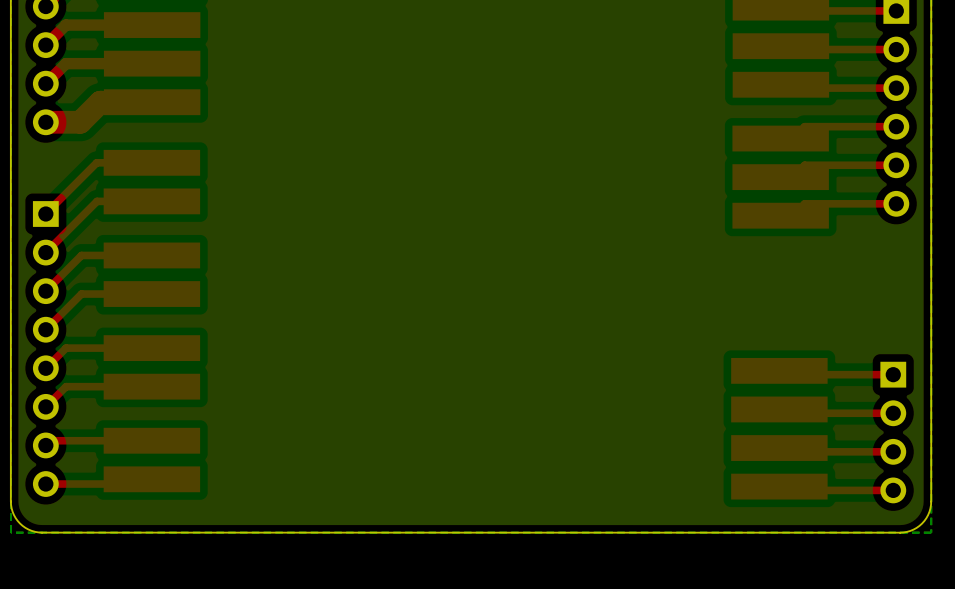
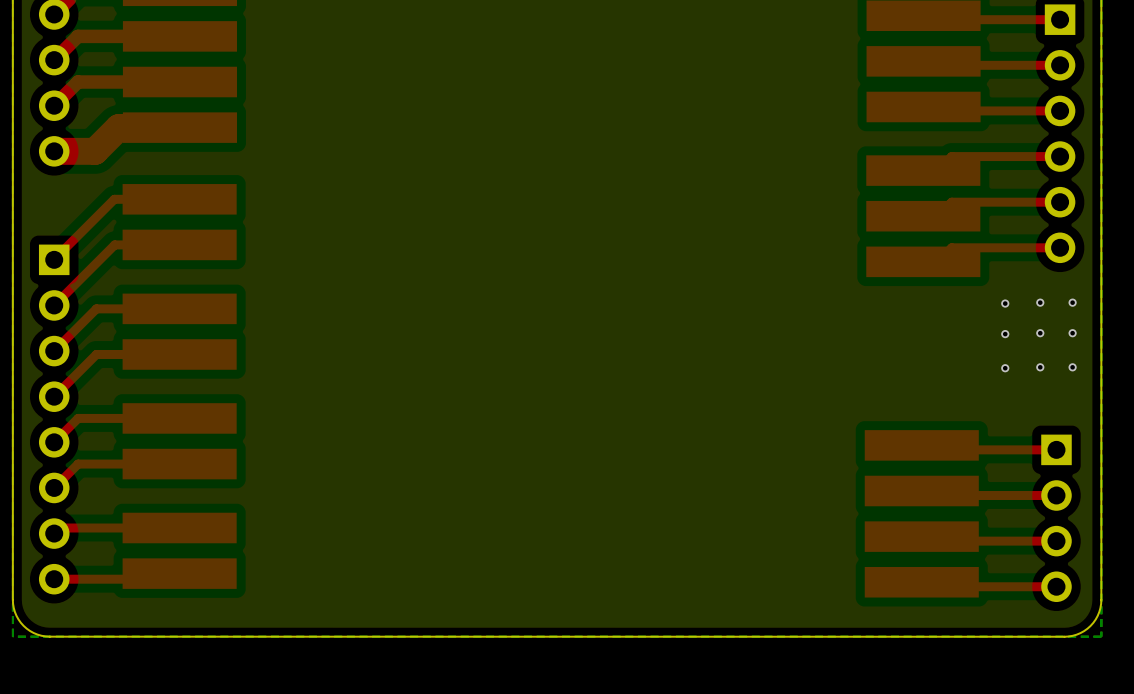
via: none -> (1005, 303)
via: none -> (1040, 302)
via: none -> (1072, 302)
via: none -> (1005, 334)
via: none -> (1040, 333)
via: none -> (1072, 333)
via: none -> (1040, 367)
via: none -> (1072, 367)
via: none -> (1005, 368)

